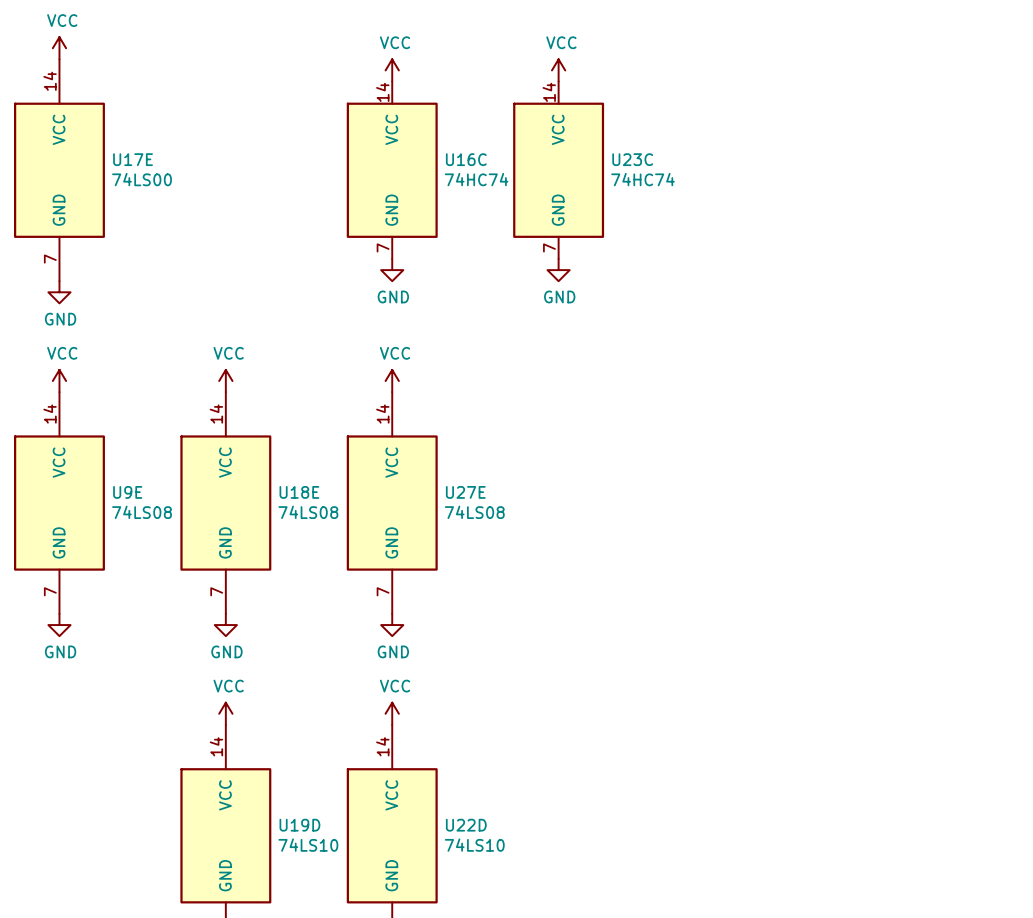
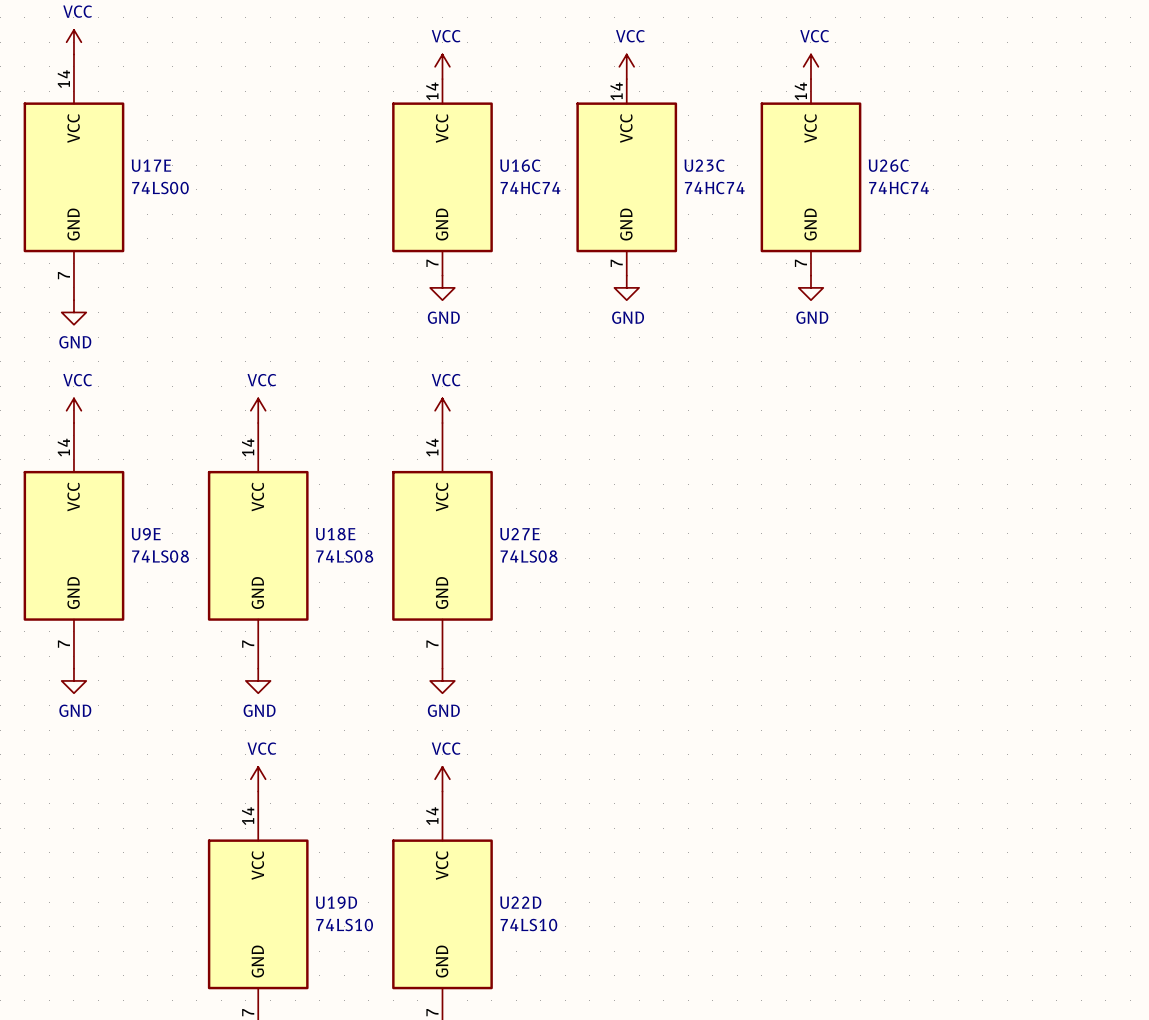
power symbol: none -> VCC (810, 66)
U26C: none -> 74HC74 (810, 177)
power symbol: none -> GND (810, 287)

